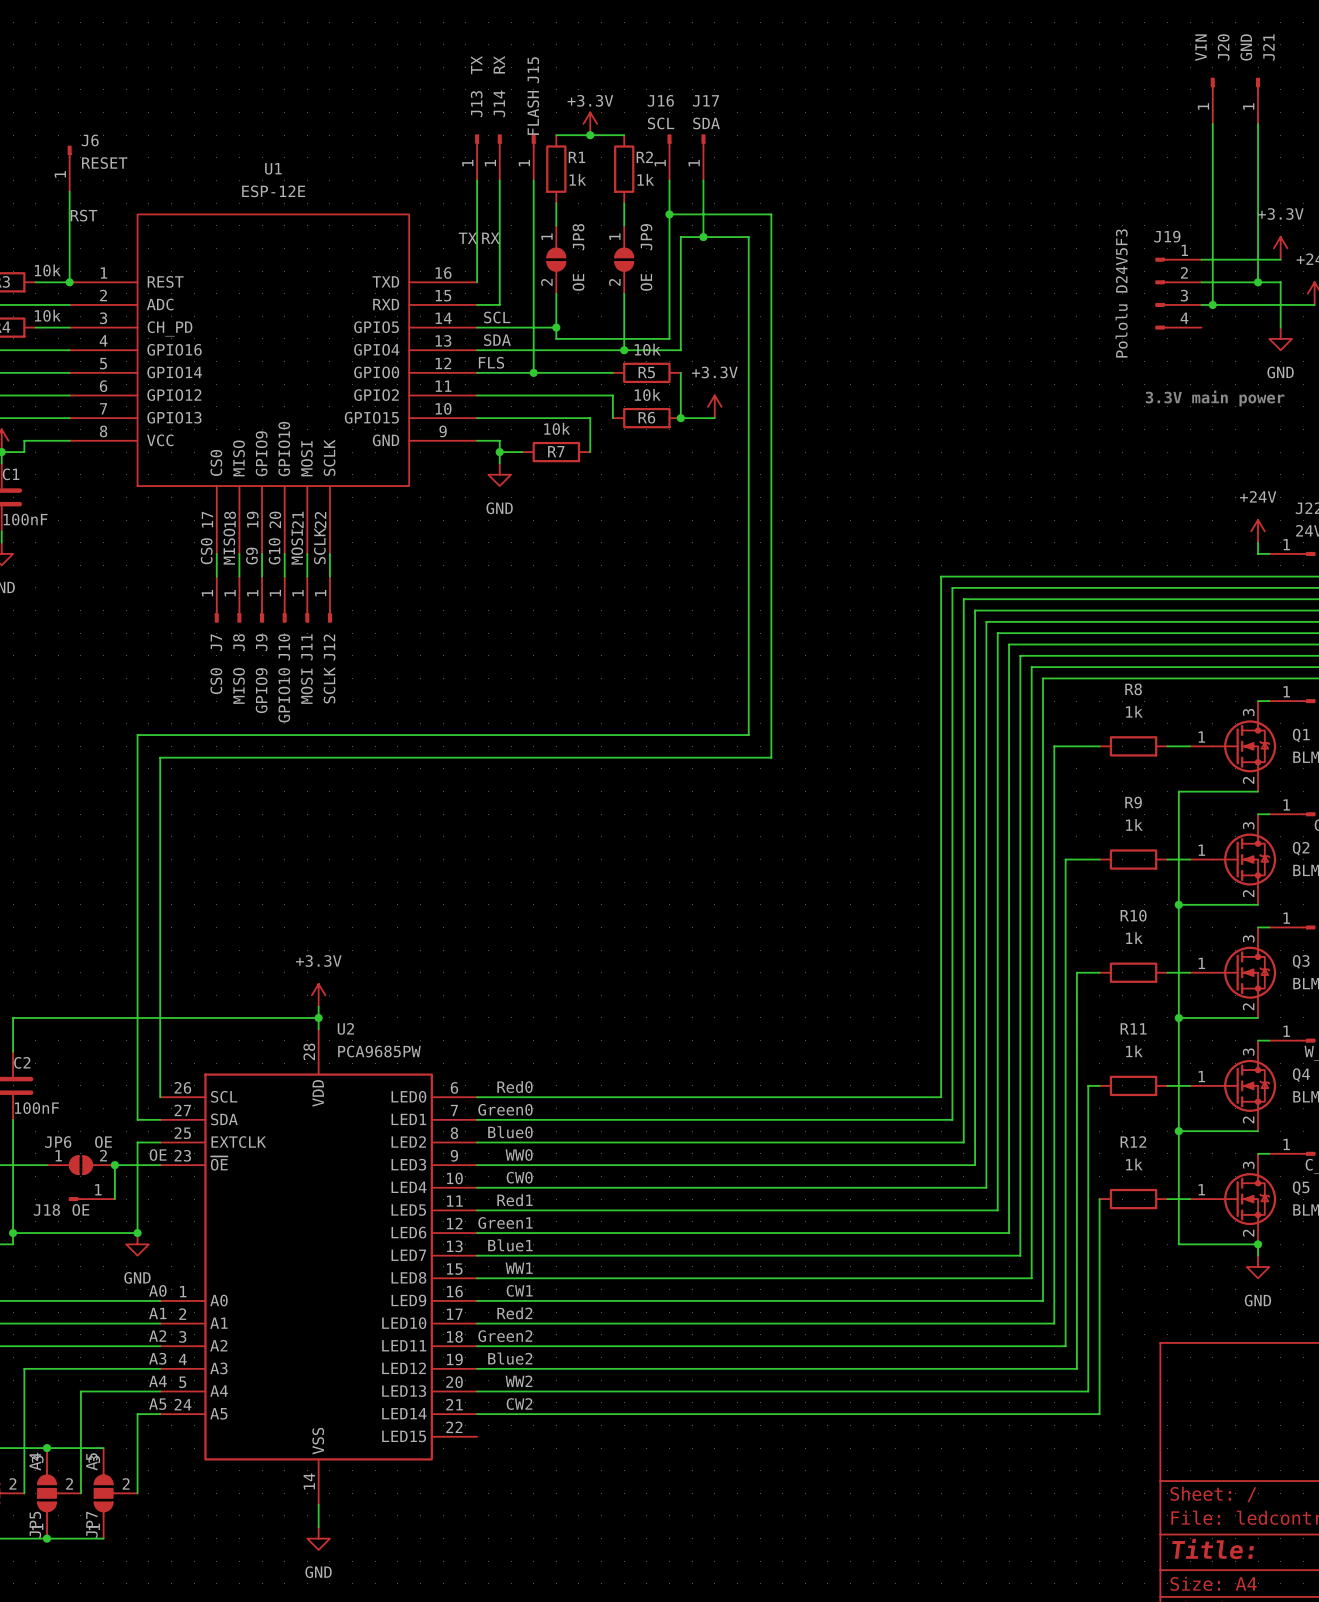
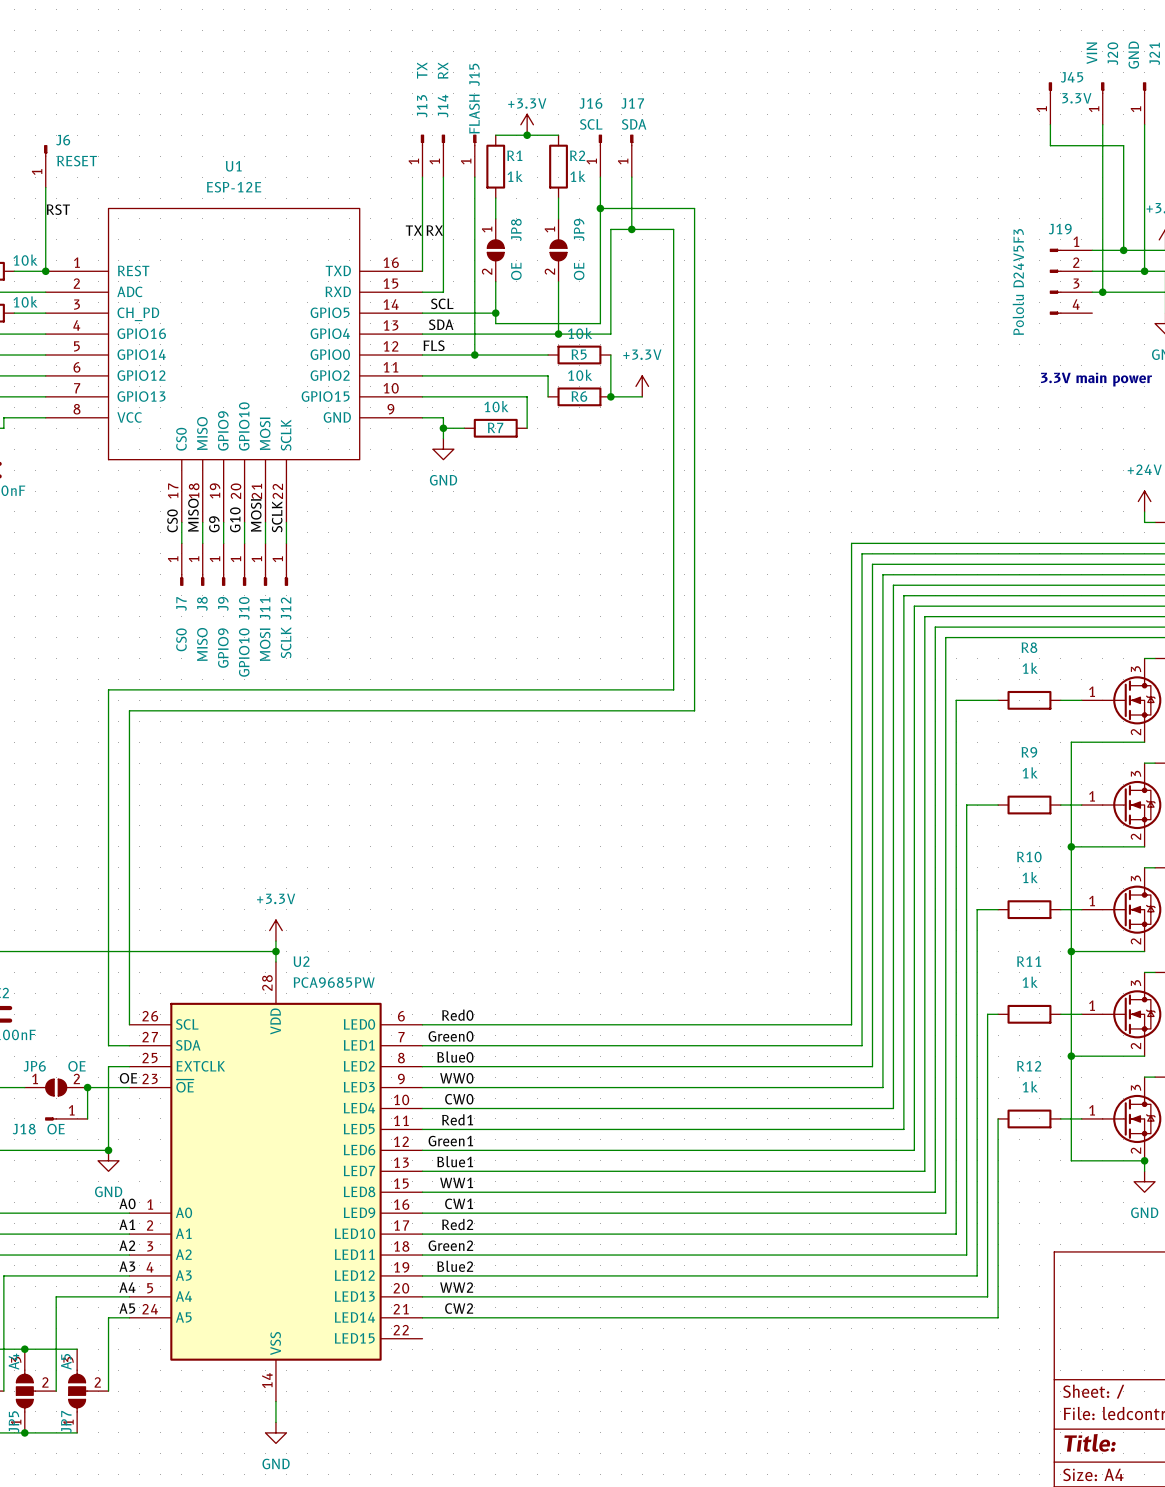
J45: none -> 3.3V (1050, 103)
wire: none -> (1050, 124) (1050, 145) (1123, 145) (1123, 250)
junction: none -> (1123, 250)

